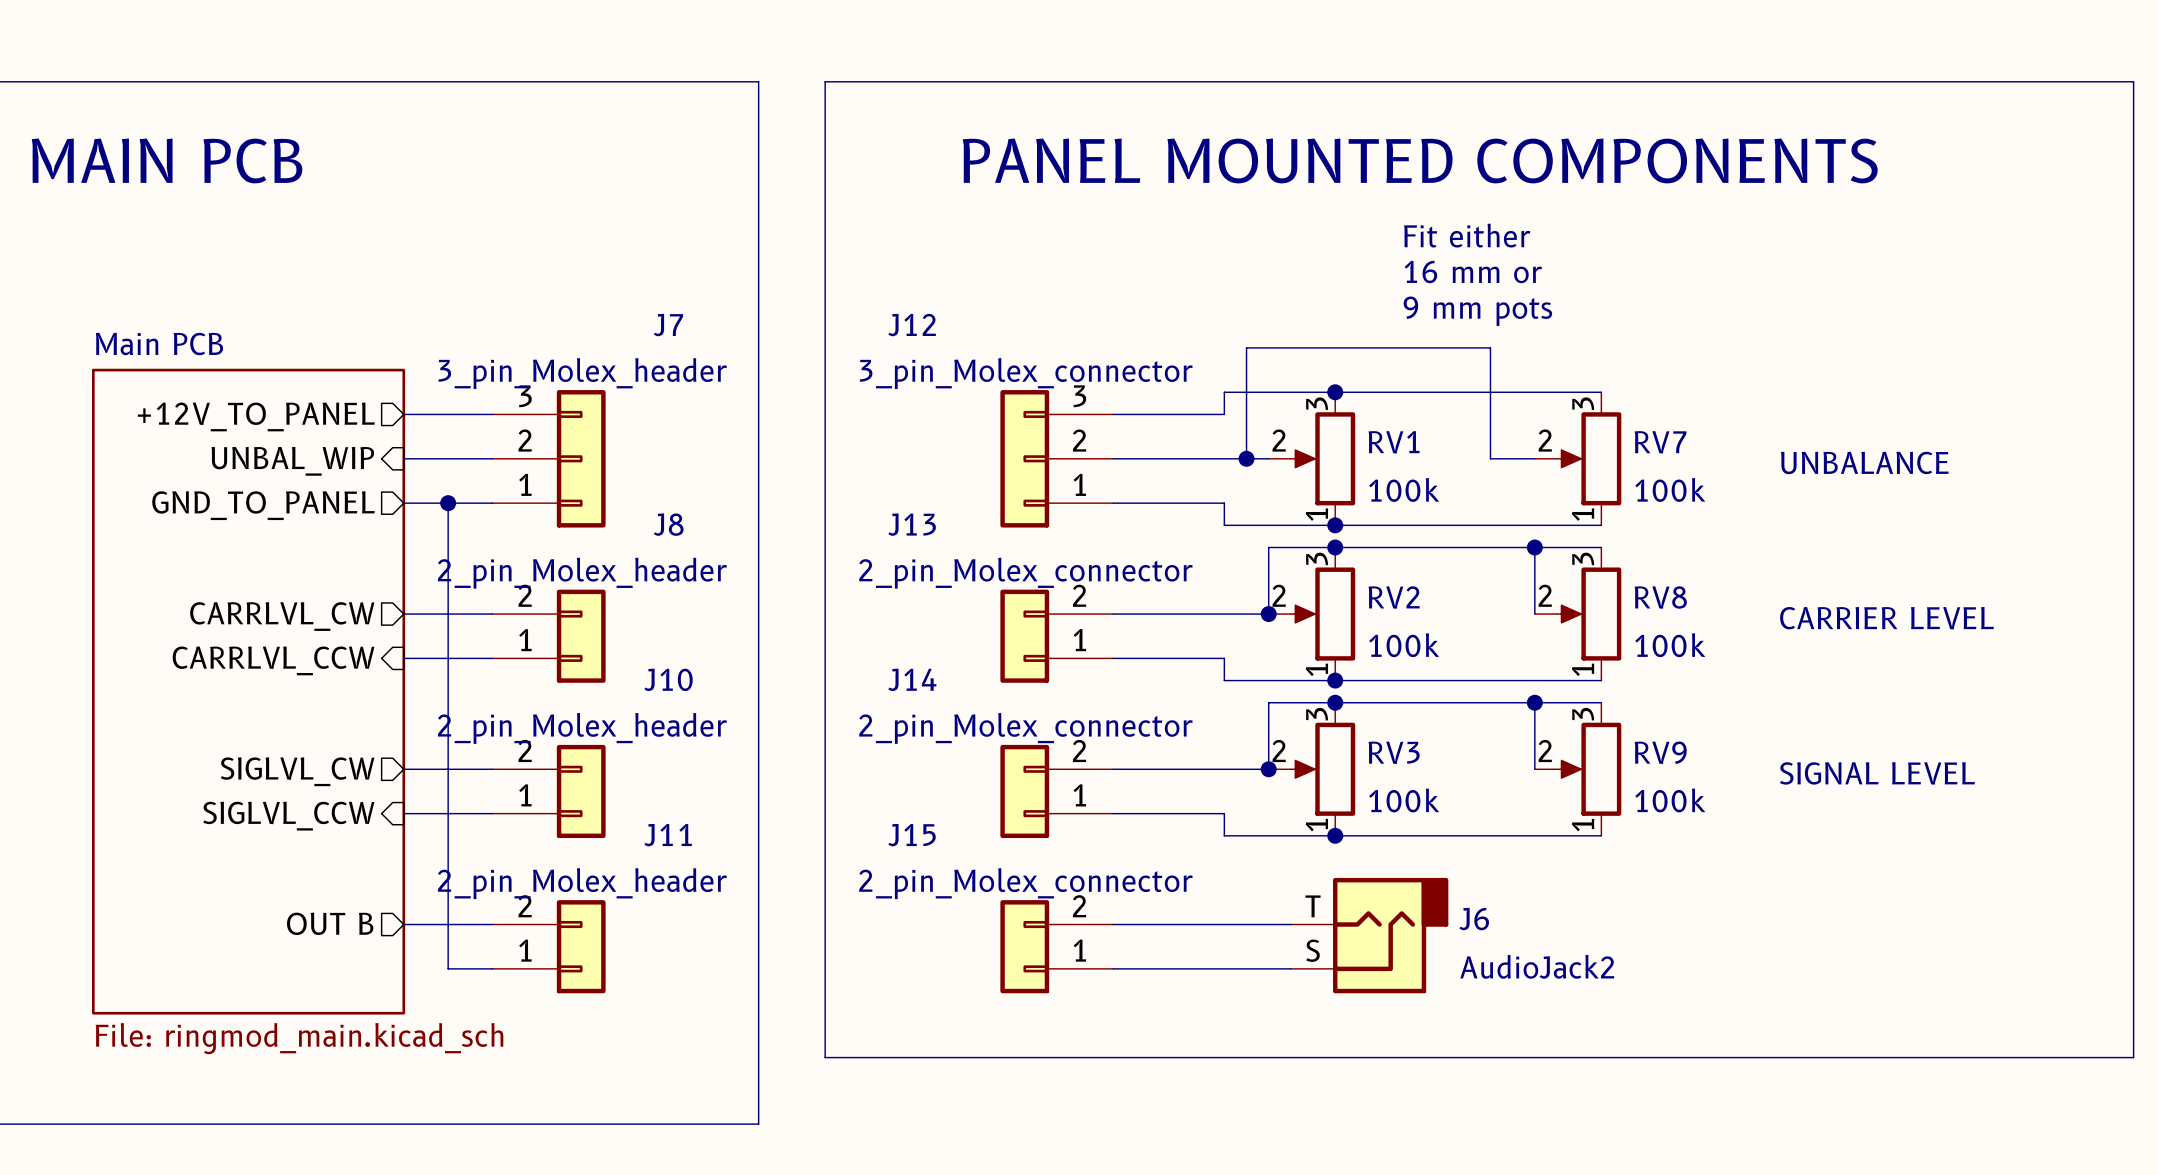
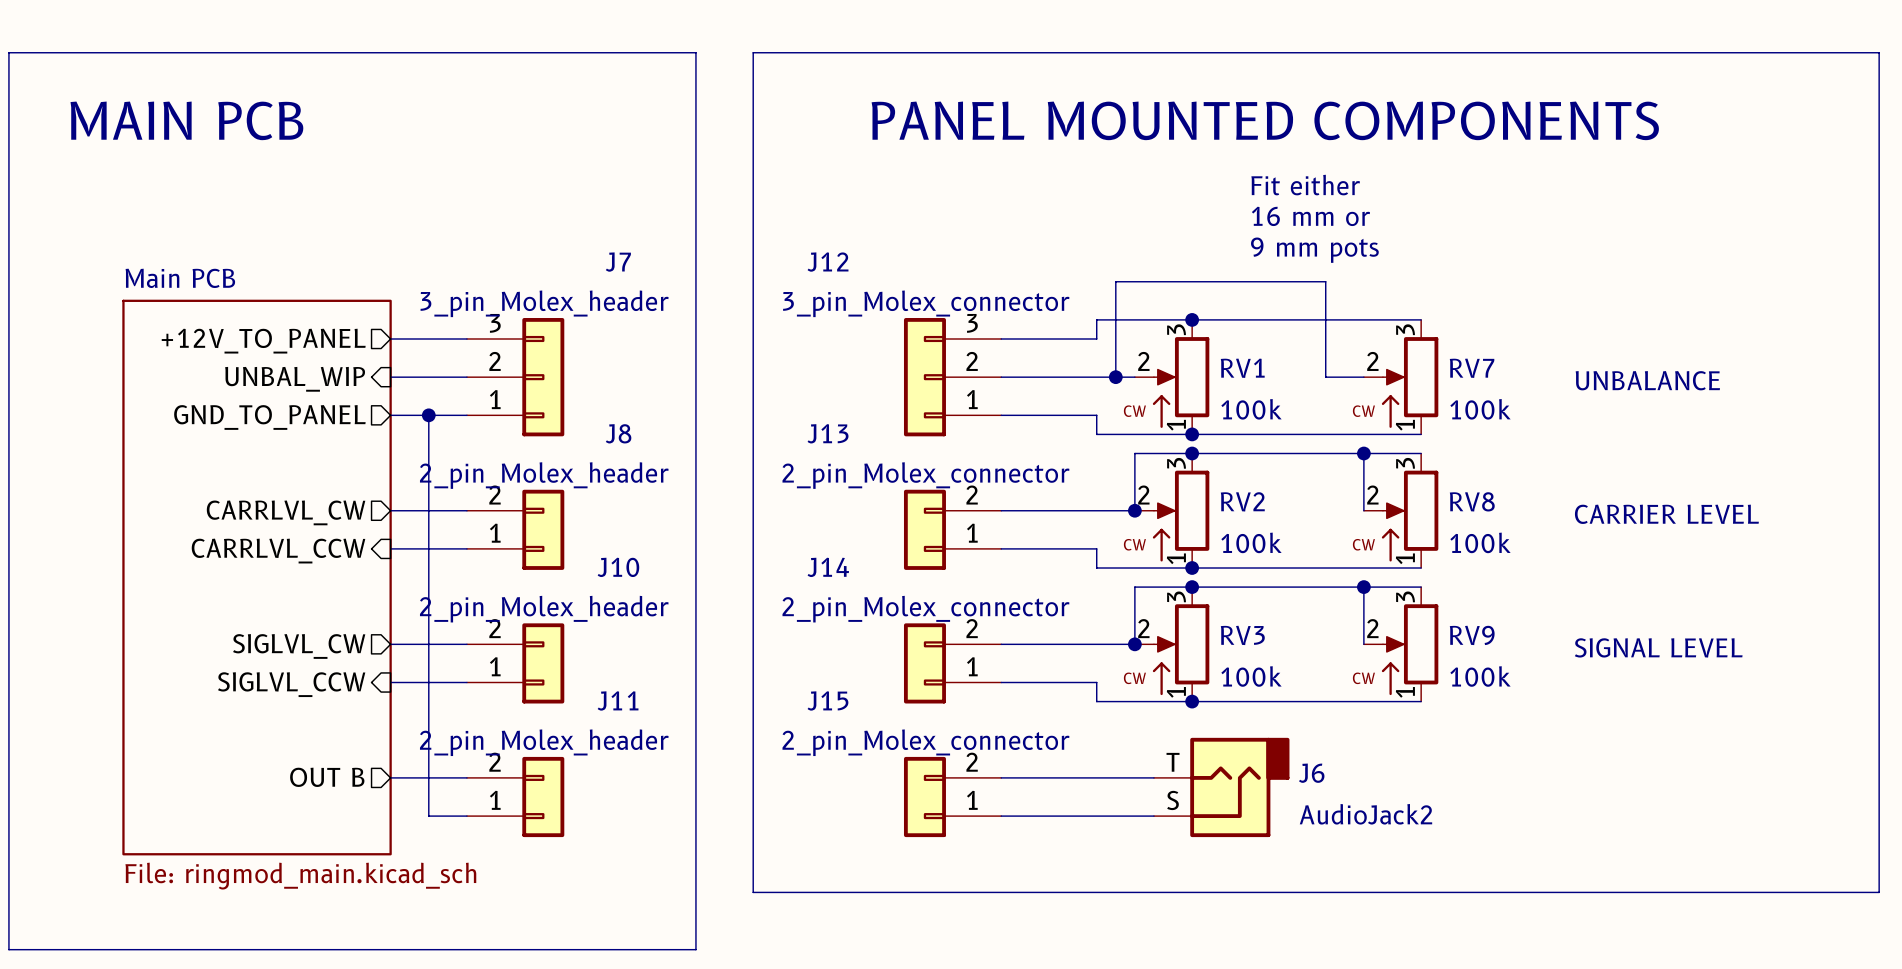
RV1 symbol: [1268, 392, 1356, 526] -> [1134, 319, 1210, 435]
RV7 symbol: [1534, 392, 1622, 526] -> [1363, 319, 1439, 435]
RV2 symbol: [1268, 547, 1356, 681] -> [1134, 453, 1210, 569]
RV8 symbol: [1534, 547, 1622, 681] -> [1363, 453, 1439, 569]
RV3 symbol: [1268, 702, 1356, 836] -> [1134, 587, 1210, 702]
RV9 symbol: [1534, 702, 1622, 836] -> [1363, 587, 1439, 702]

